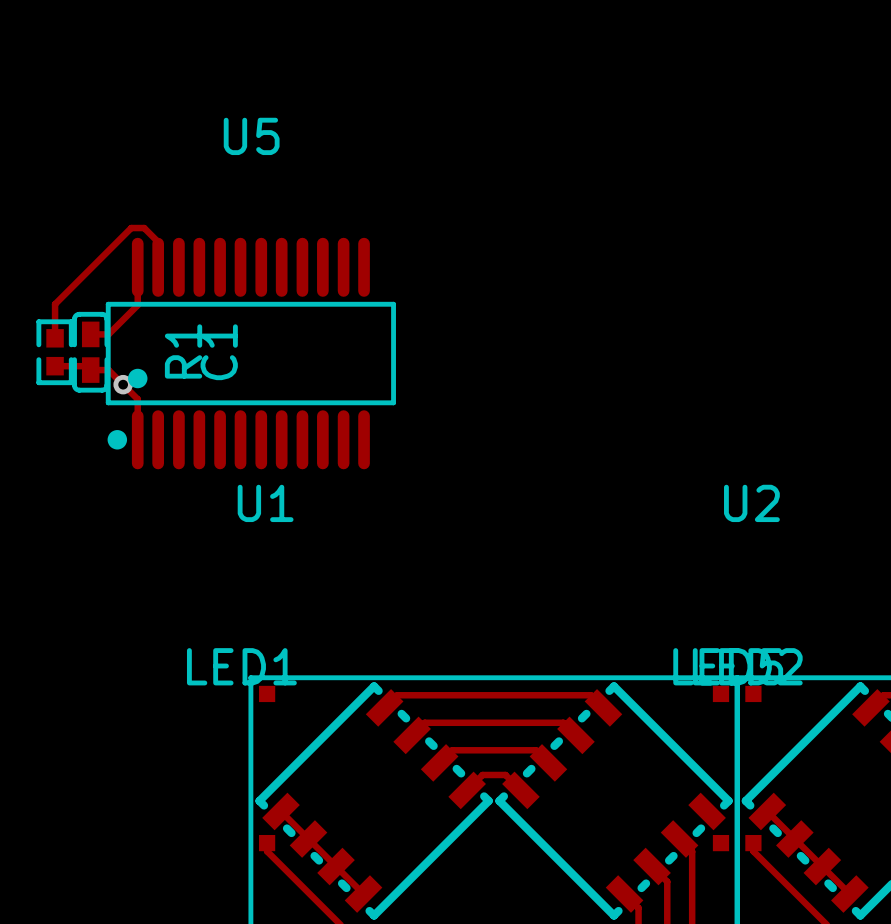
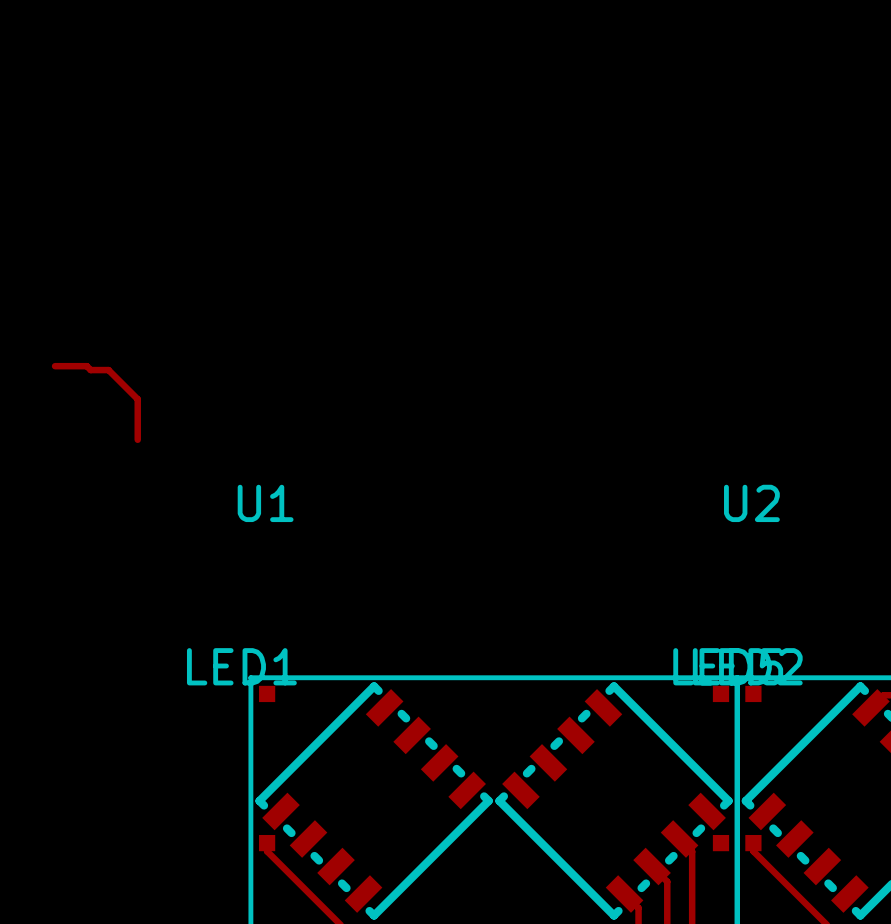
top track: (137, 267) (137, 305) (108, 334) (90, 334) -> none
top track: (158, 267) (158, 242) (144, 228) (131, 228) (55, 304) (55, 338) -> none
R1: (55, 352) -> none
C1: (90, 352) -> none
U5: (250, 353) -> none
via: (123, 384) -> none
top track: (384, 707) (397, 695) (590, 695) (603, 707) -> none
top track: (412, 735) (424, 722) (563, 722) (575, 735) -> none
top track: (439, 762) (452, 750) (535, 750) (548, 762) -> none
top track: (467, 790) (482, 774) (505, 774) (520, 790) -> none
top track: (281, 811) (363, 894) -> none
top track: (767, 811) (849, 894) -> none

